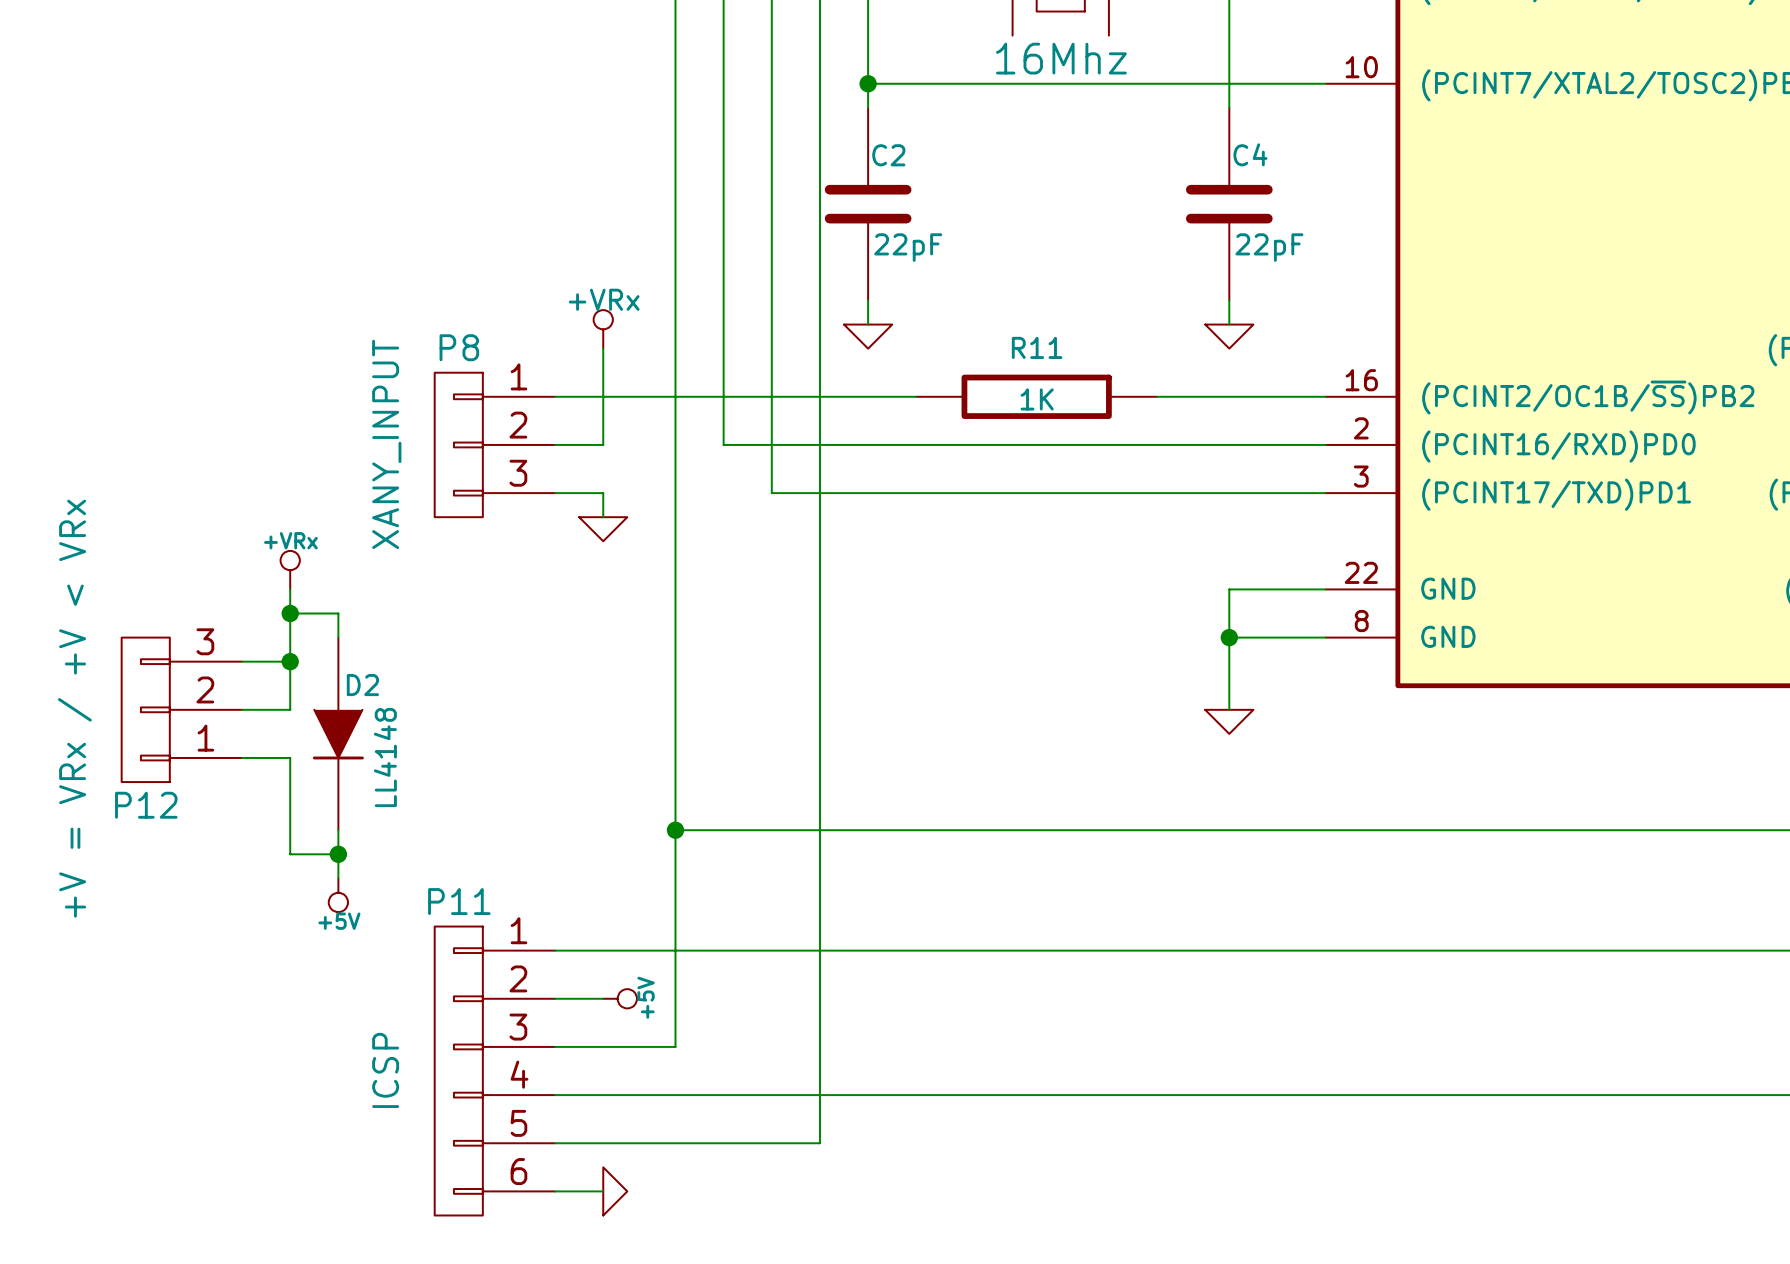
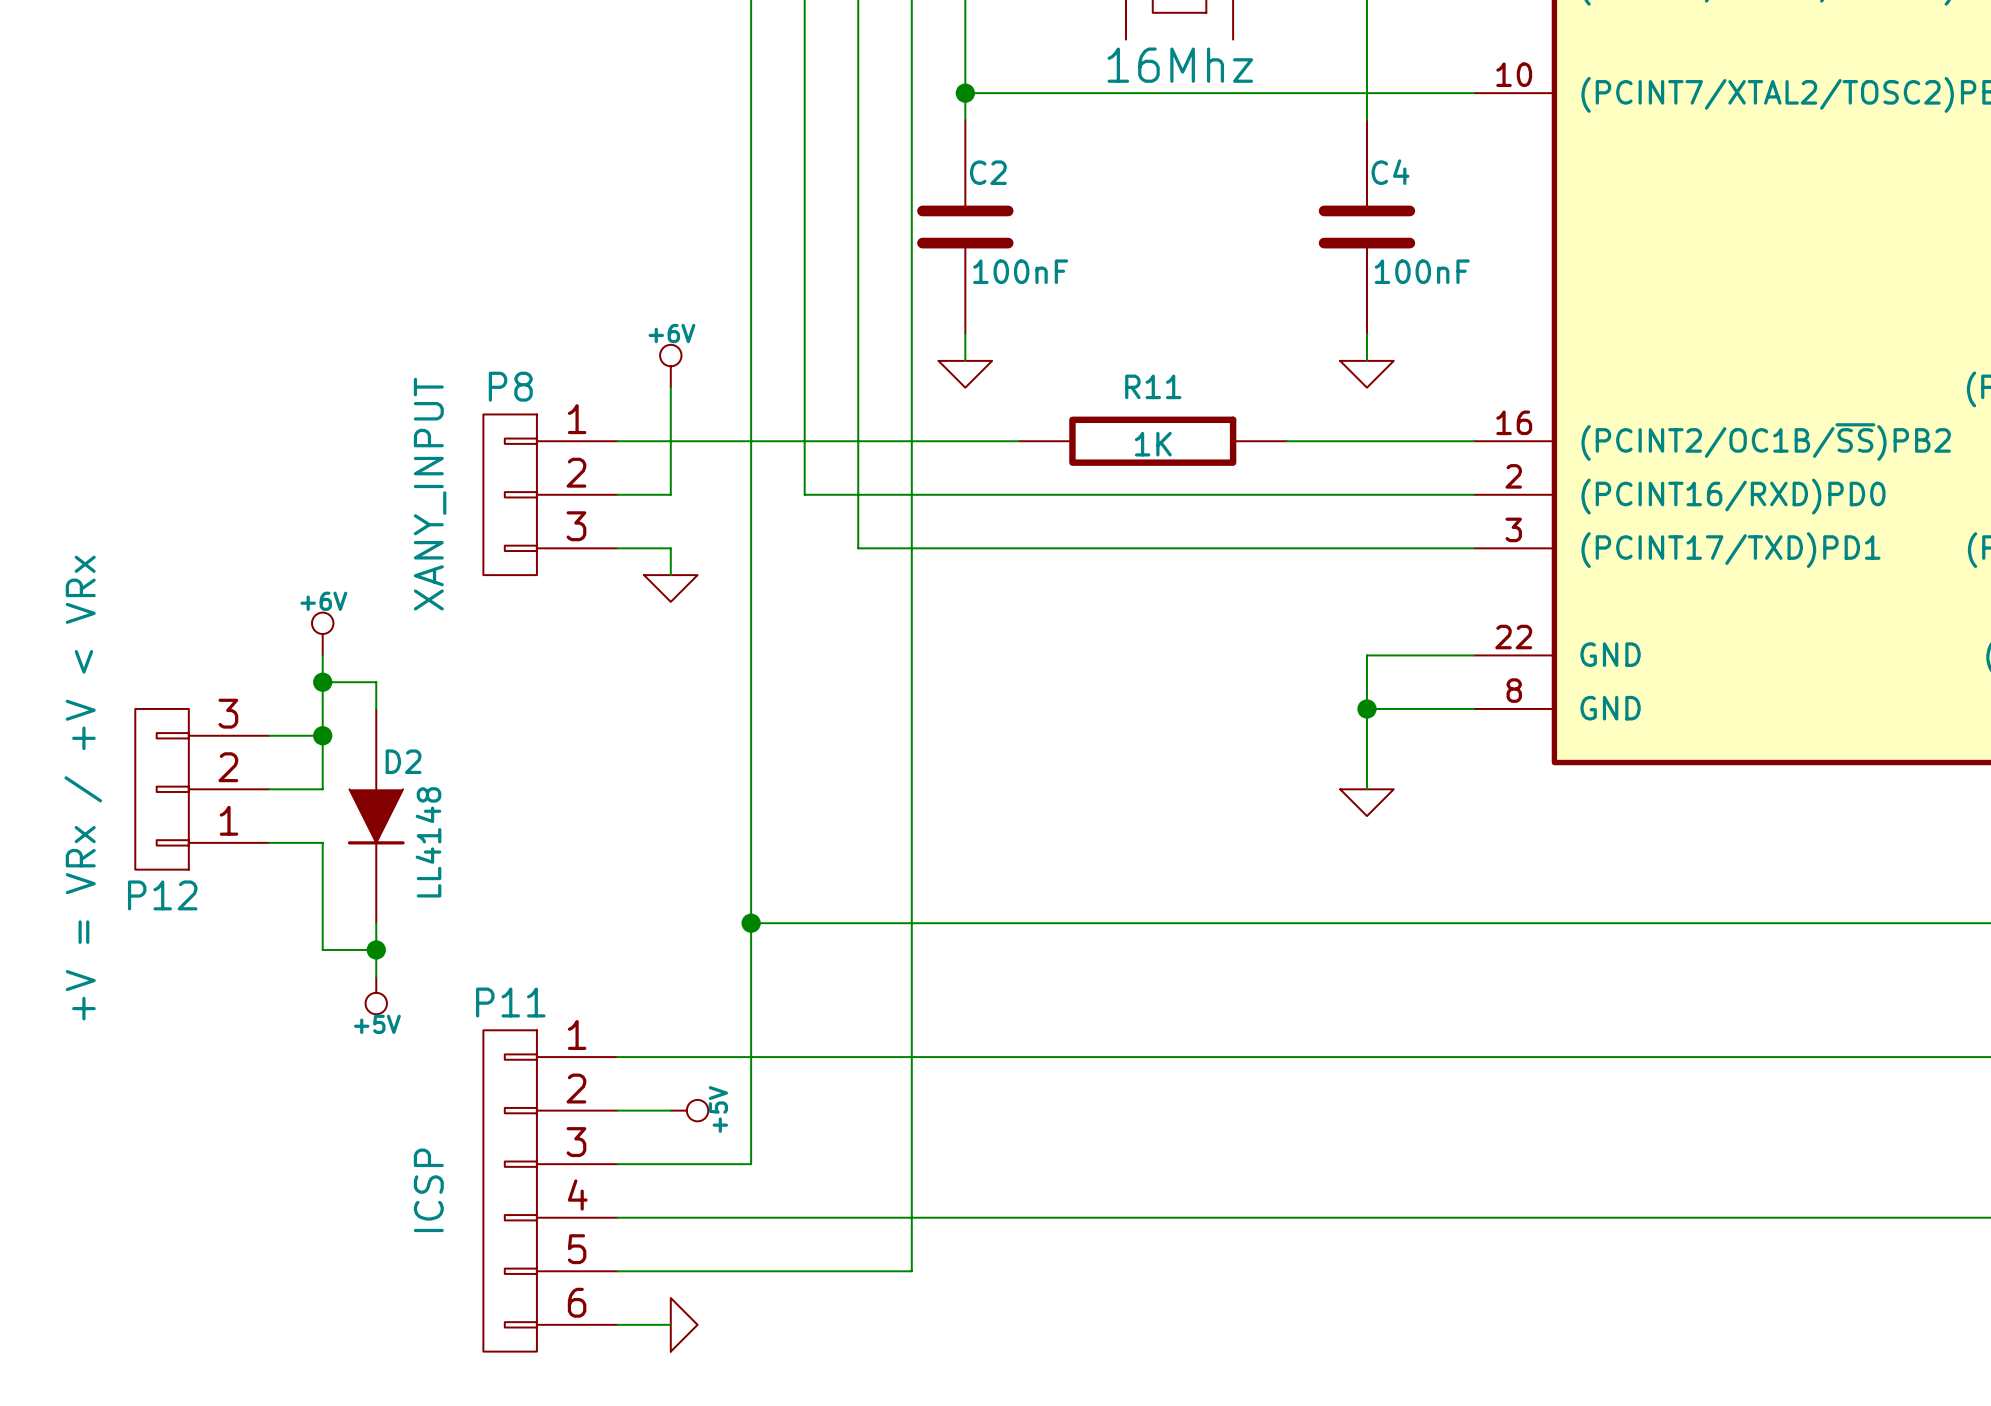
C2 value: 22pF (908, 247) -> 100nF (1020, 271)
C4 value: 22pF (1269, 247) -> 100nF (1422, 271)
power symbol: +VRx (603, 329) -> +6V (670, 366)
power symbol: +VRx (290, 570) -> +6V (322, 634)

